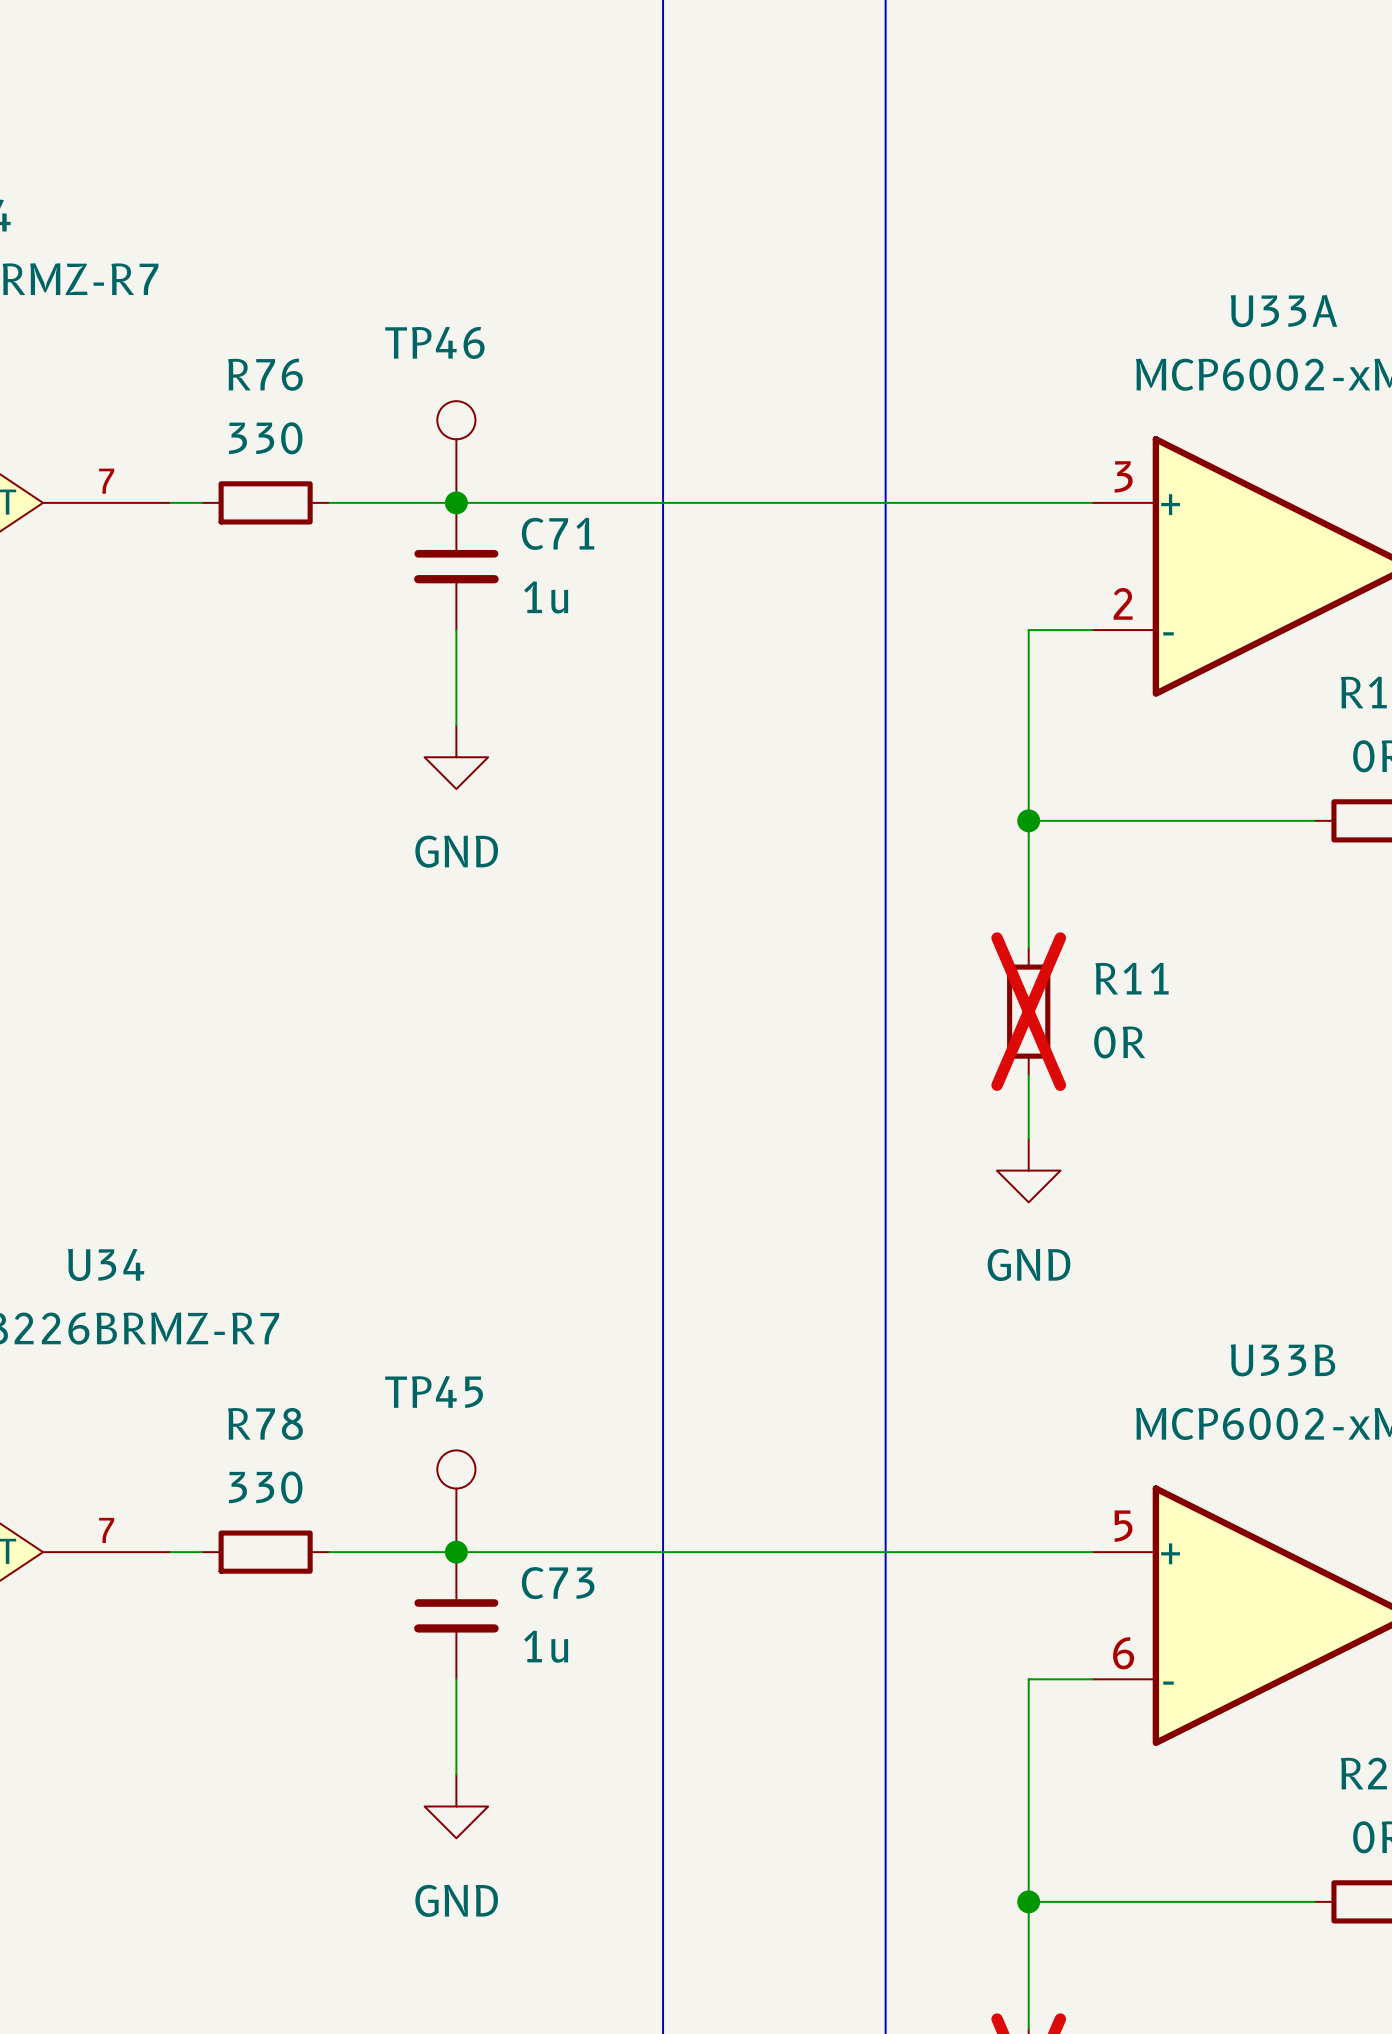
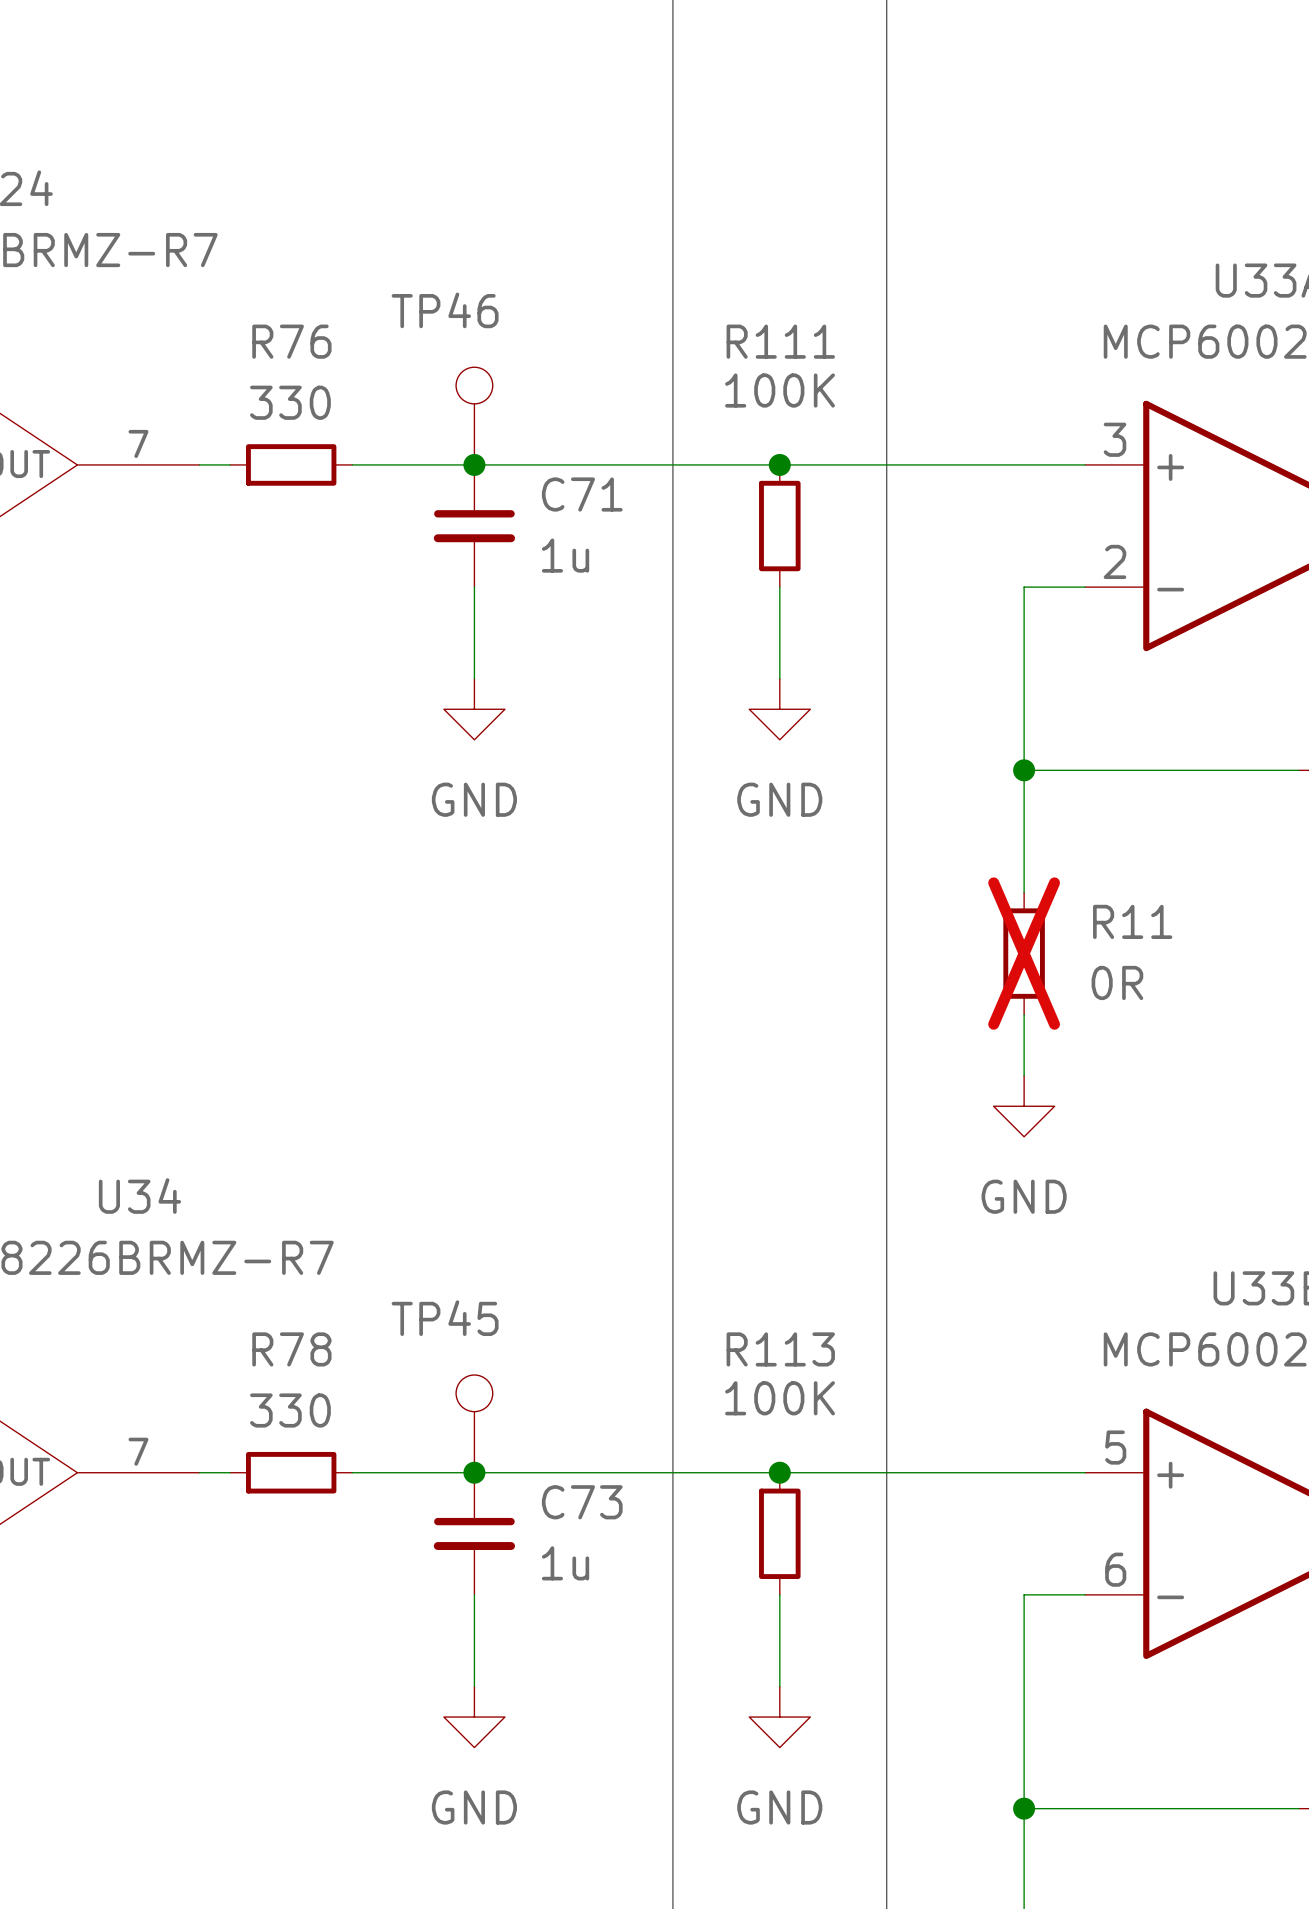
junction: none -> (779, 464)
R111: none -> 100K (779, 526)
wire: none -> (779, 587) (779, 678)
power symbol: none -> GND (779, 709)
junction: none -> (779, 1472)
R113: none -> 100K (779, 1533)
wire: none -> (779, 1594) (779, 1686)
power symbol: none -> GND (779, 1717)

